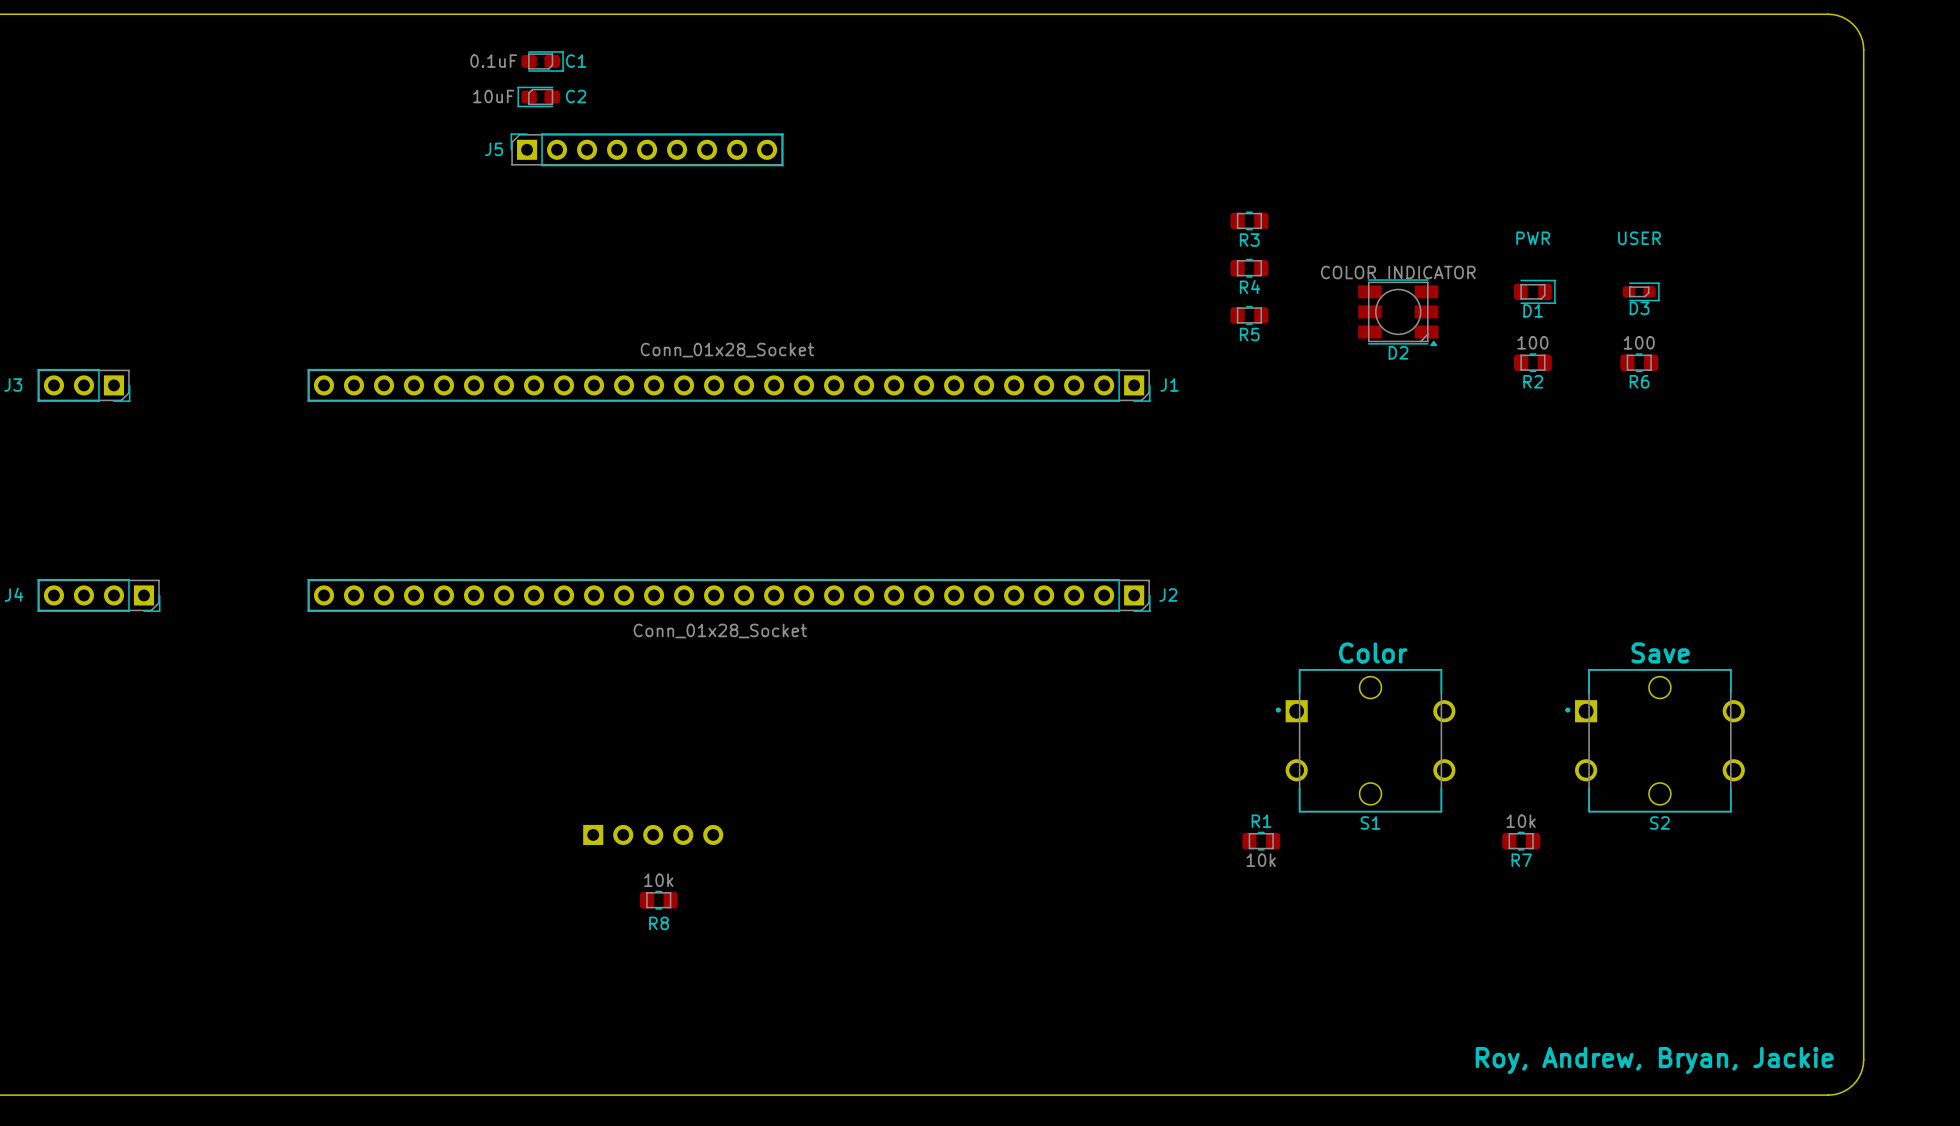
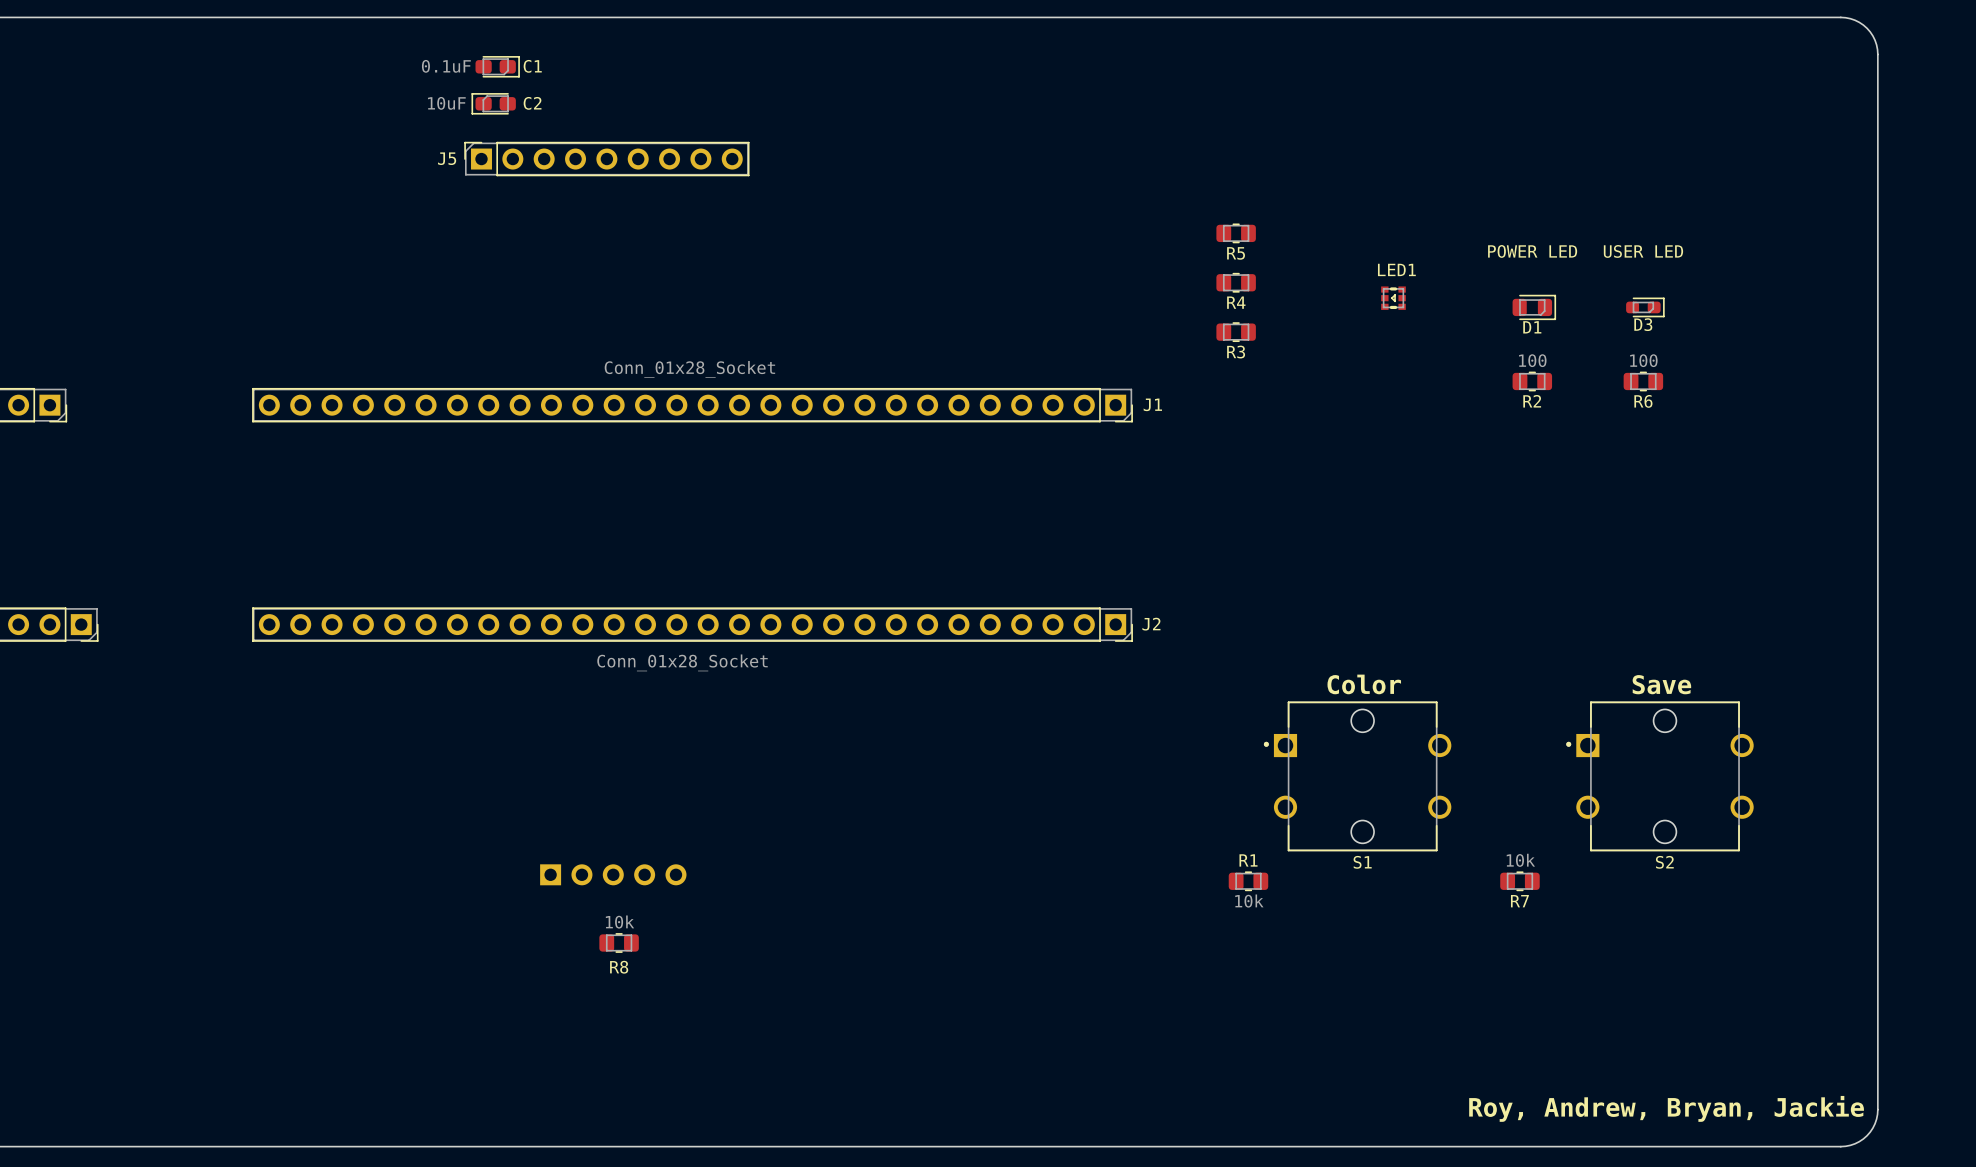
D1 value: PWR (1533, 238) -> POWER LED (1532, 251)
D3 value: USER (1639, 238) -> USER LED (1643, 251)
R3 name: R3 (1249, 240) -> R5 (1236, 253)
LED1: none -> (1393, 298)
D2: COLOR INDICATOR (1398, 312) -> none
R5 name: R5 (1249, 334) -> R3 (1236, 352)

